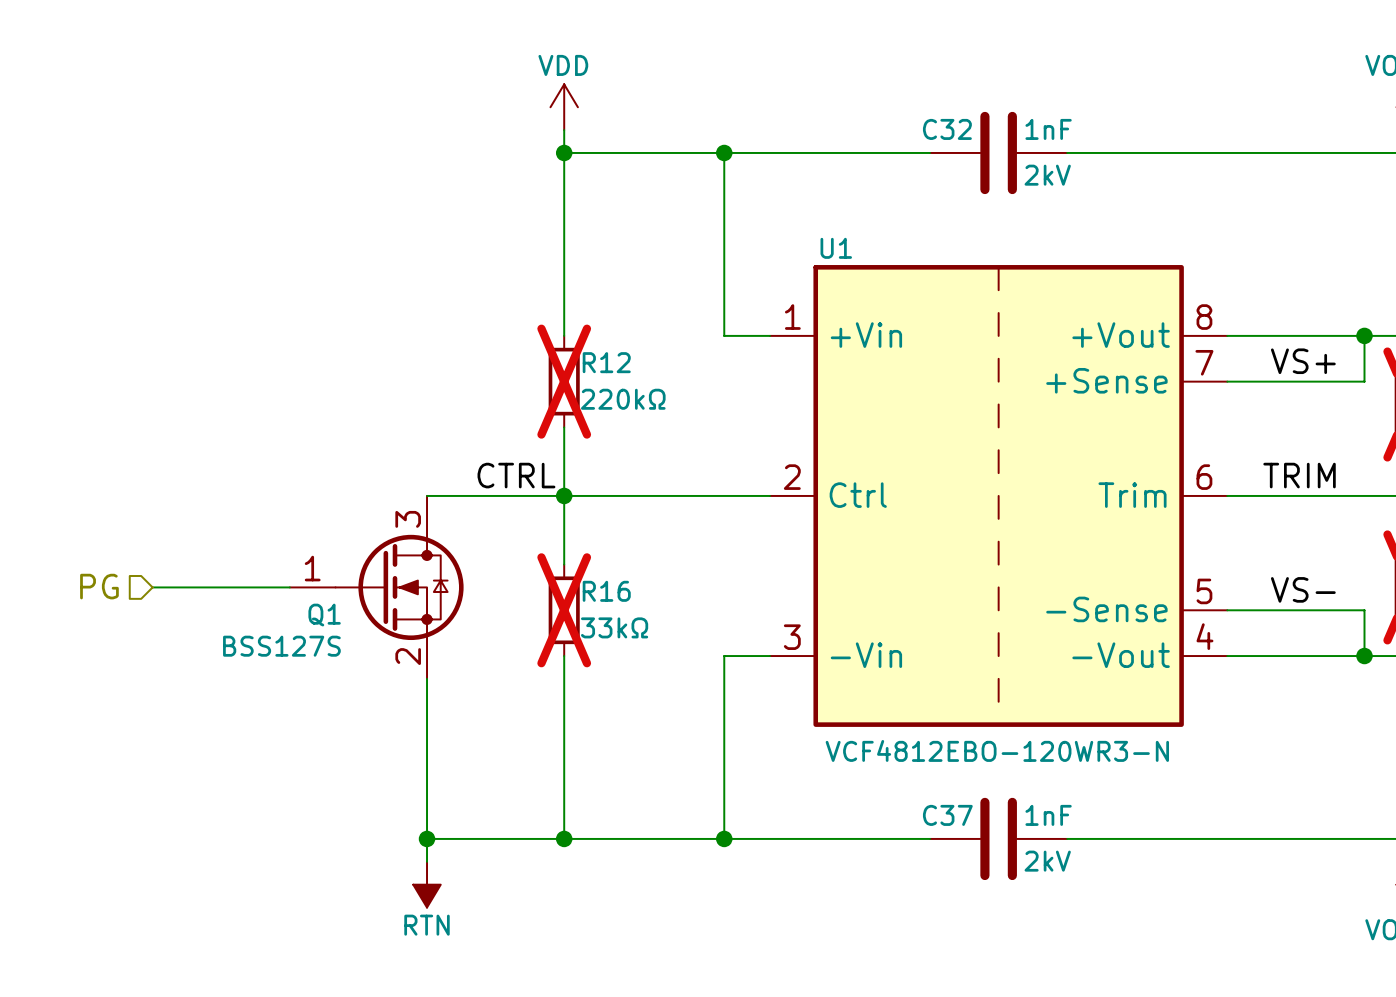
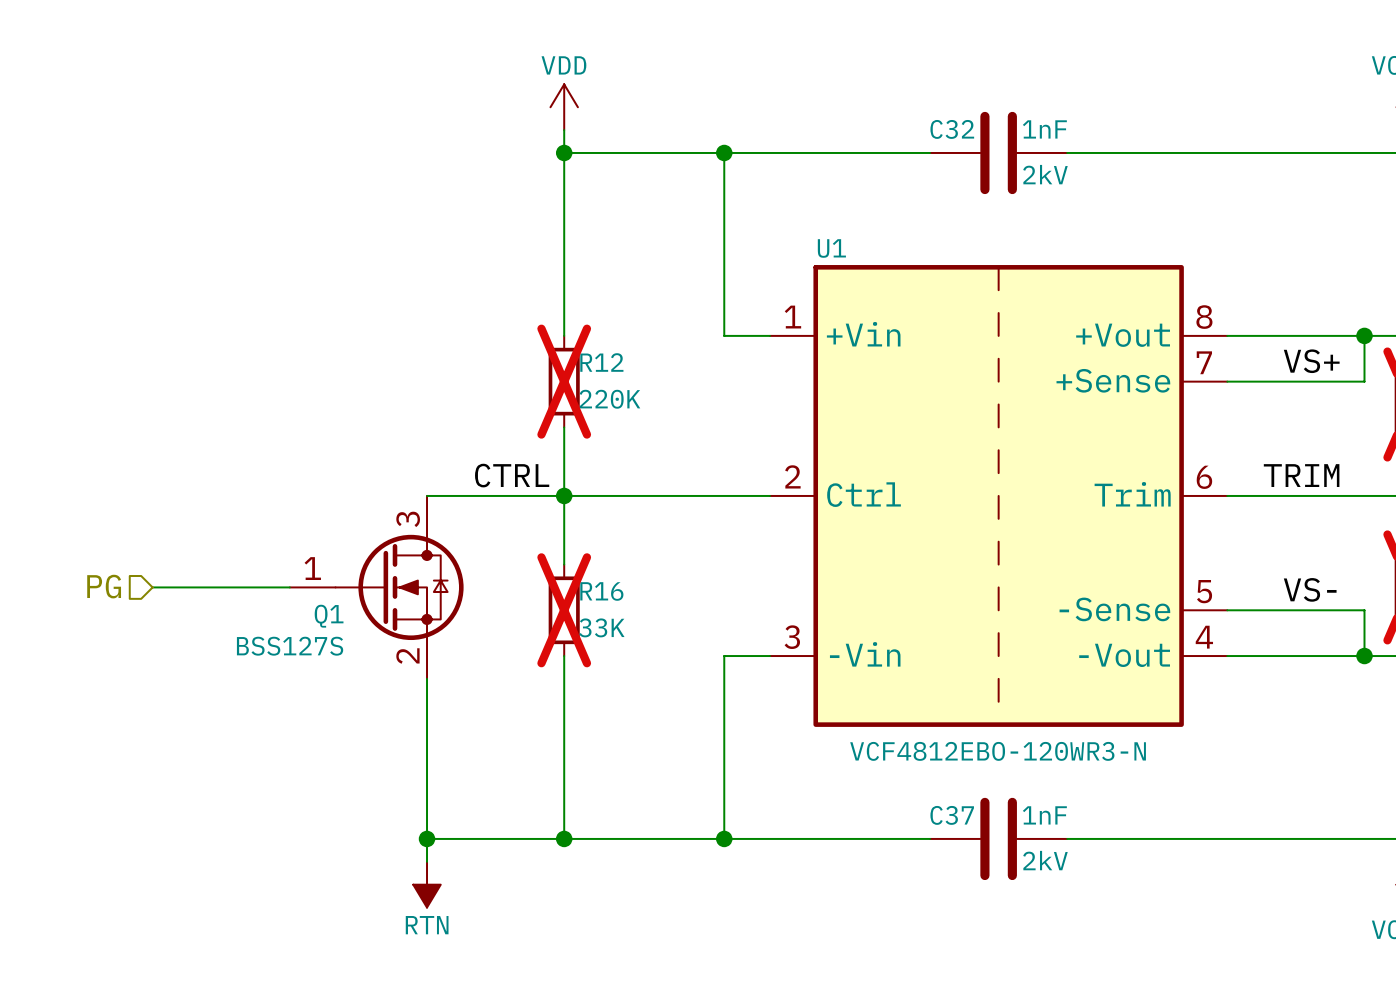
R12 value: 220kΩ (623, 399) -> 220K (609, 399)
R16 value: 33kΩ (614, 627) -> 33K (601, 627)

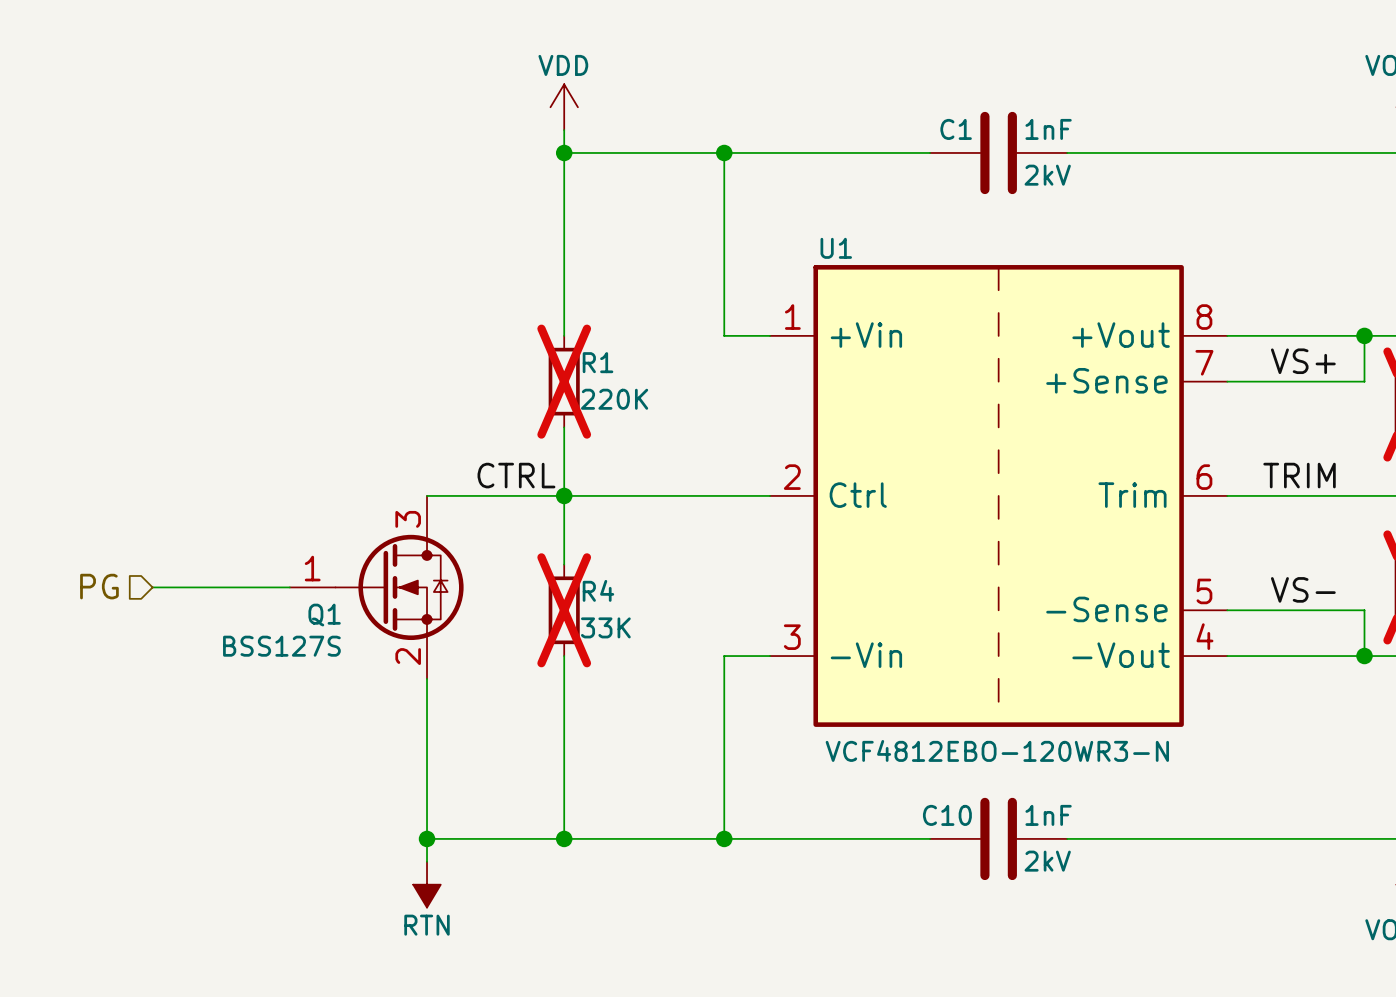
C32 name: C32 (952, 129) -> C1 (956, 129)
R12 name: R12 (601, 362) -> R1 (598, 362)
R16 name: R16 (601, 591) -> R4 (598, 590)
C37 name: C37 (952, 815) -> C10 (947, 815)

